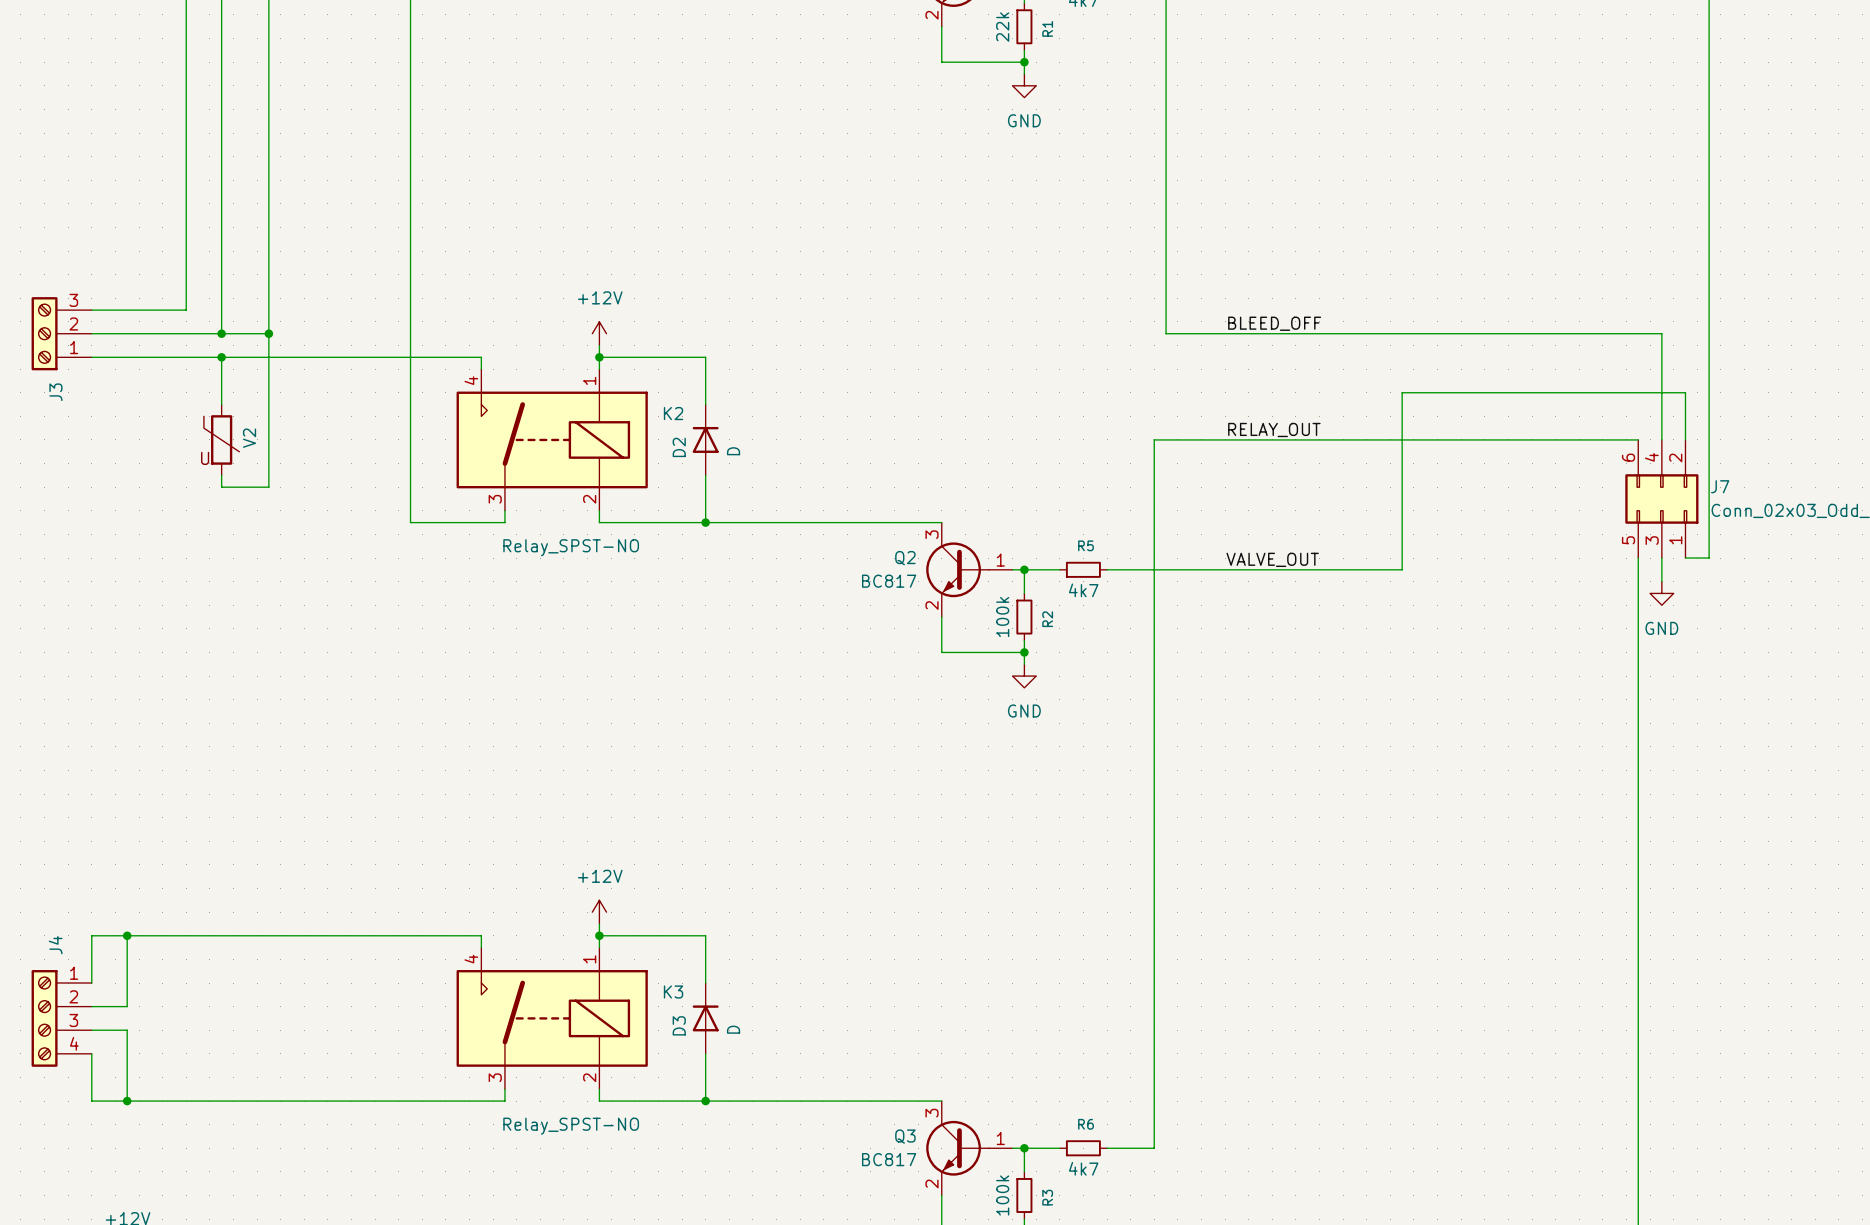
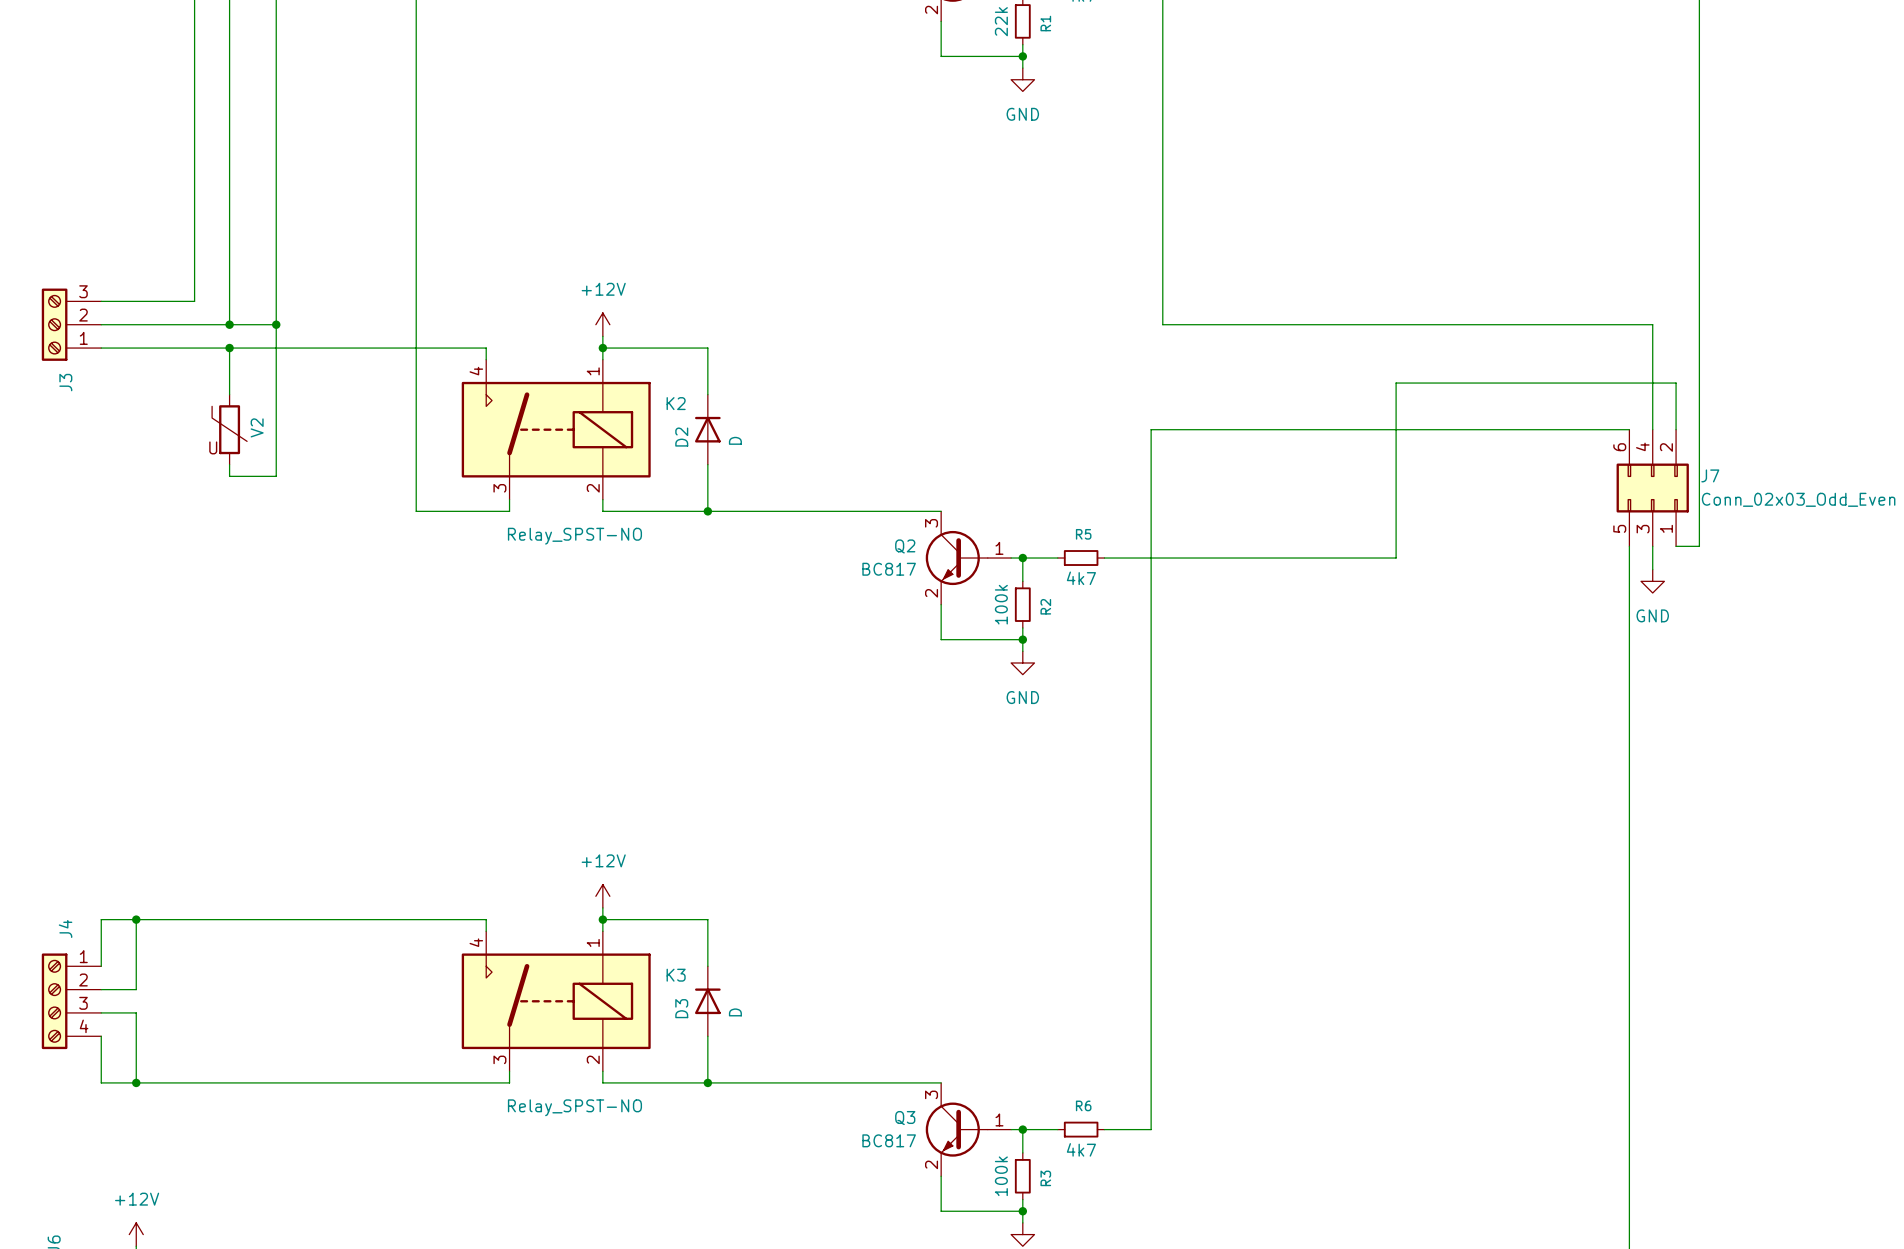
label: BLEED_OFF (1274, 323) -> none
label: RELAY_OUT (1274, 429) -> none
label: VALVE_OUT (1272, 559) -> none

